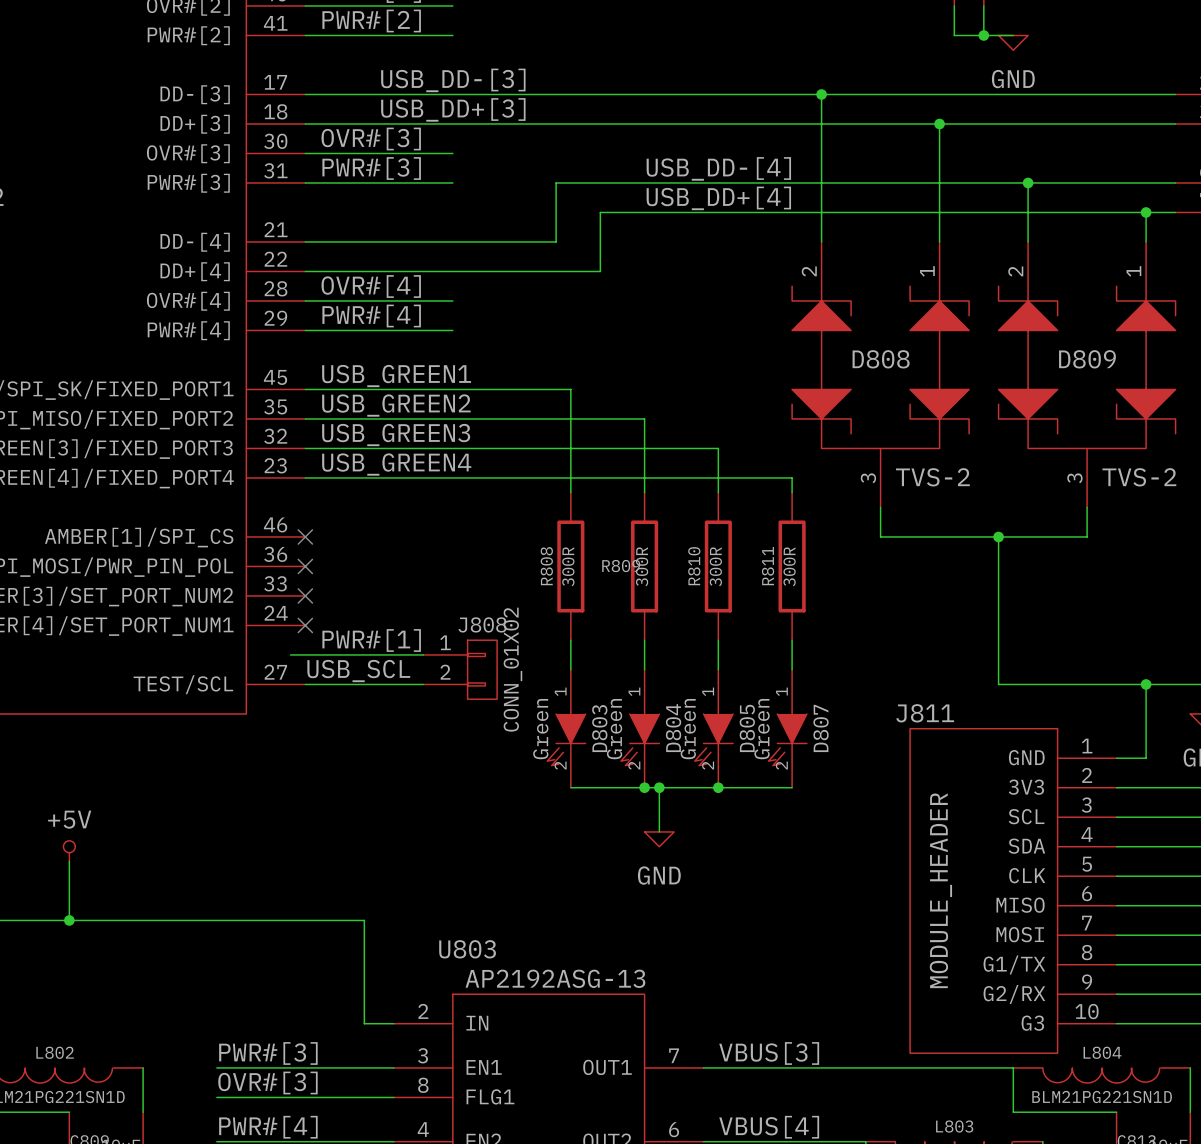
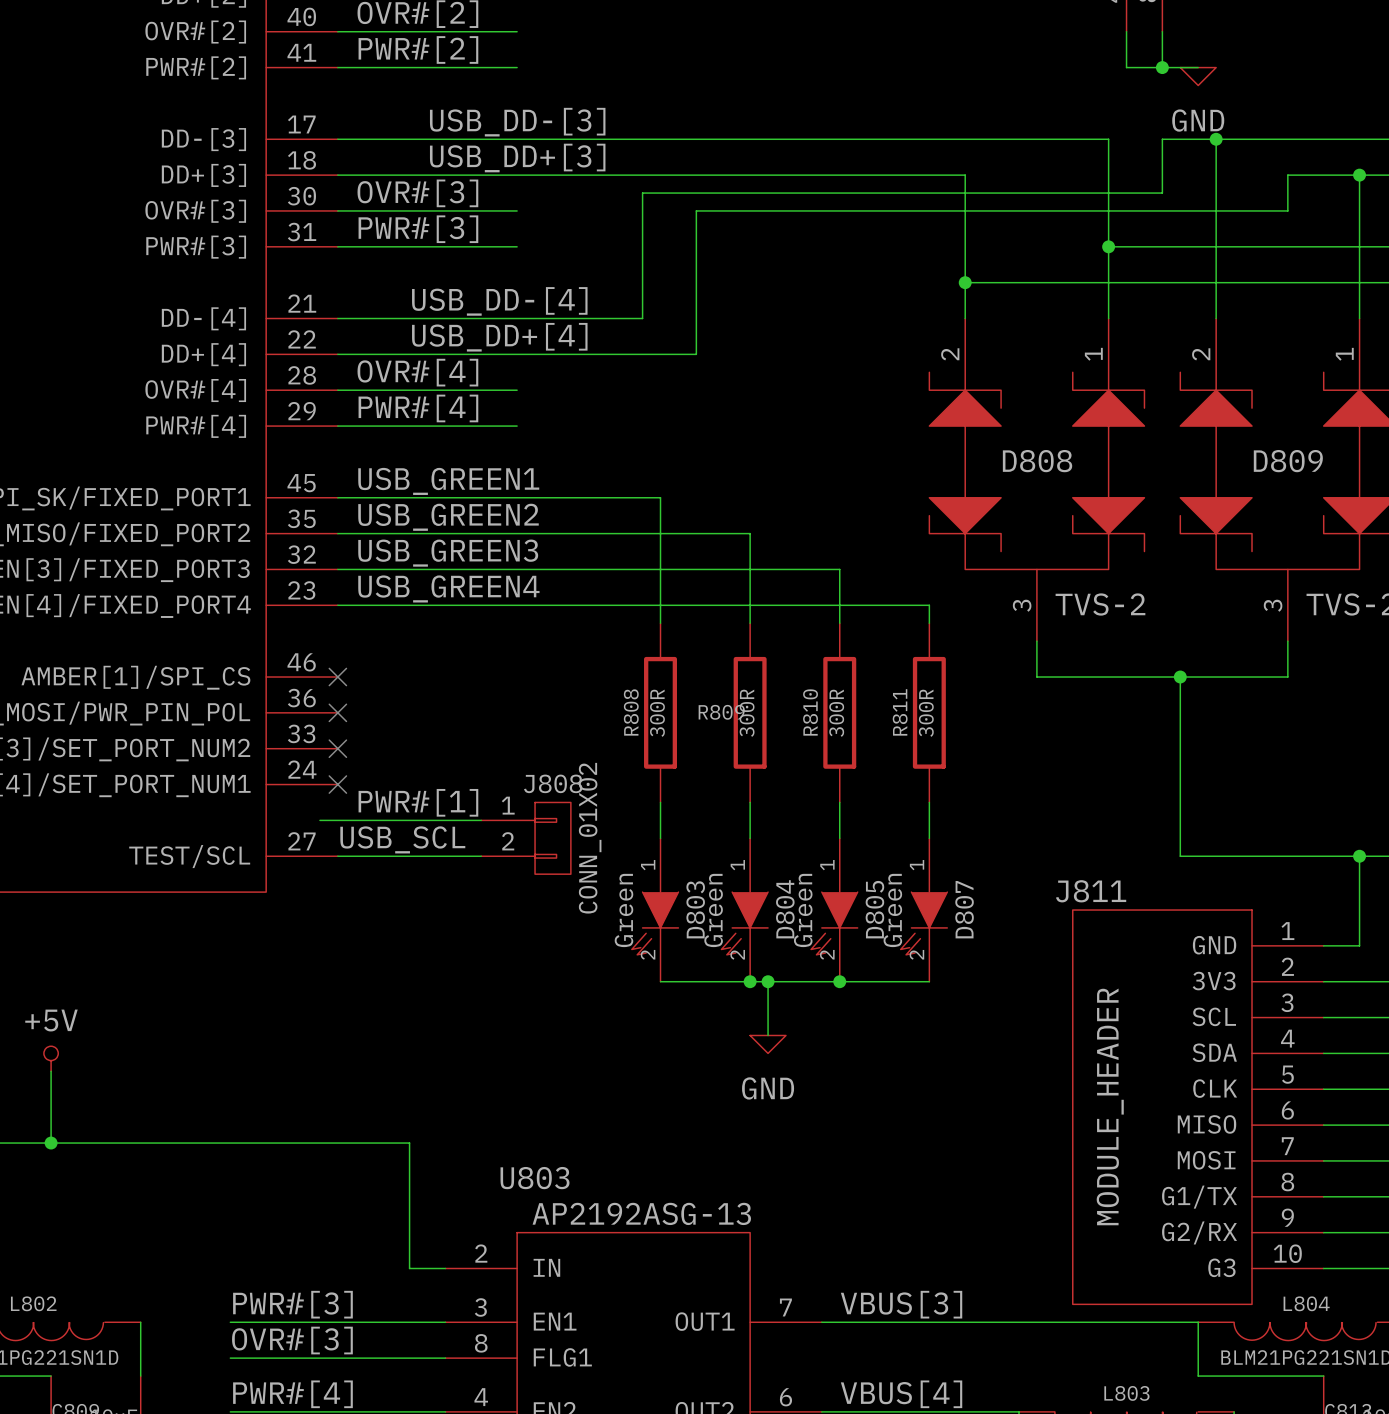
wire: (821, 94) (821, 123) (1087, 123) -> (696, 282) (696, 210) (1287, 210) (1287, 175)
junction: (821, 94) -> none
wire: (939, 94) (983, 94) -> (1108, 139) (1108, 175)
wire: none -> (1216, 139) (1216, 246)
junction: none -> (1216, 139)
junction: (939, 123) -> none
wire: none -> (1359, 175) (1359, 282)
junction: none -> (1359, 175)
label position: USB_DD-[4] (718, 168) -> USB_DD-[4] (499, 301)
wire: (556, 182) (939, 182) -> (642, 246) (642, 193) (1162, 193) (1162, 139)
junction: none -> (1108, 246)
junction: (1028, 182) -> none
label position: USB_DD+[4] (718, 198) -> USB_DD+[4] (499, 337)
wire: (600, 212) (821, 212) -> none
junction: none -> (965, 282)
junction: (1146, 212) -> none

